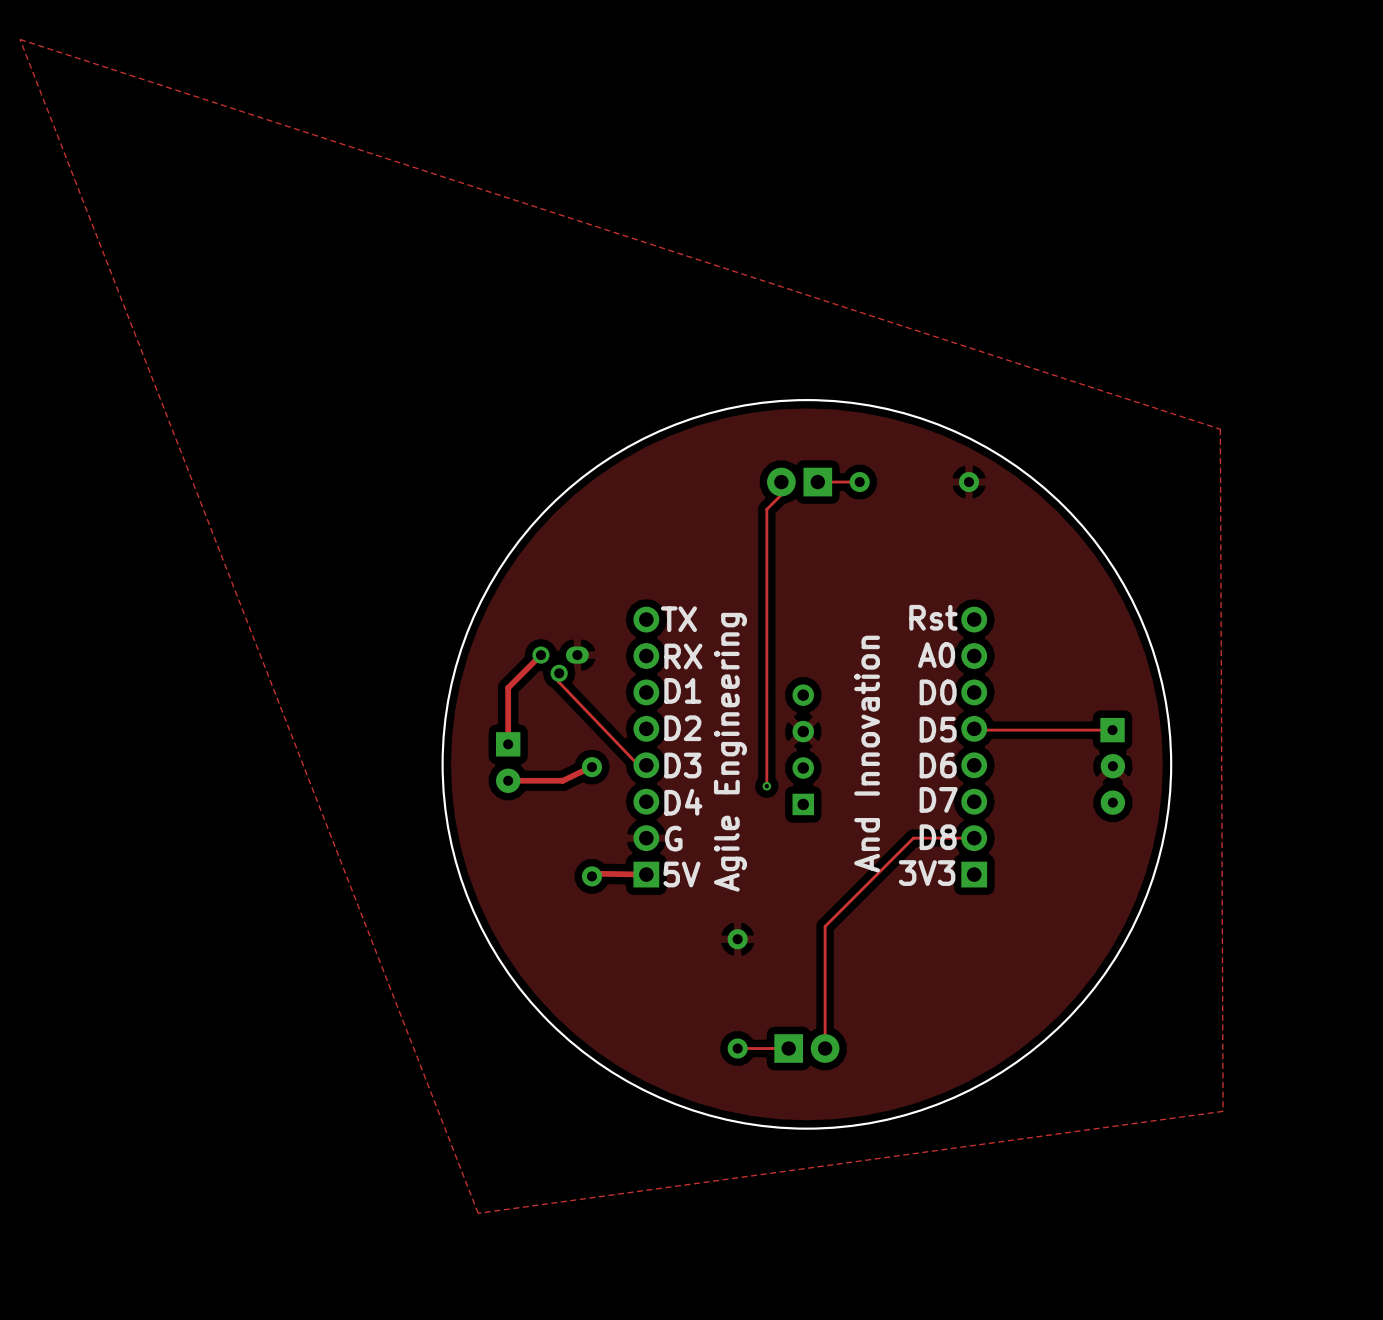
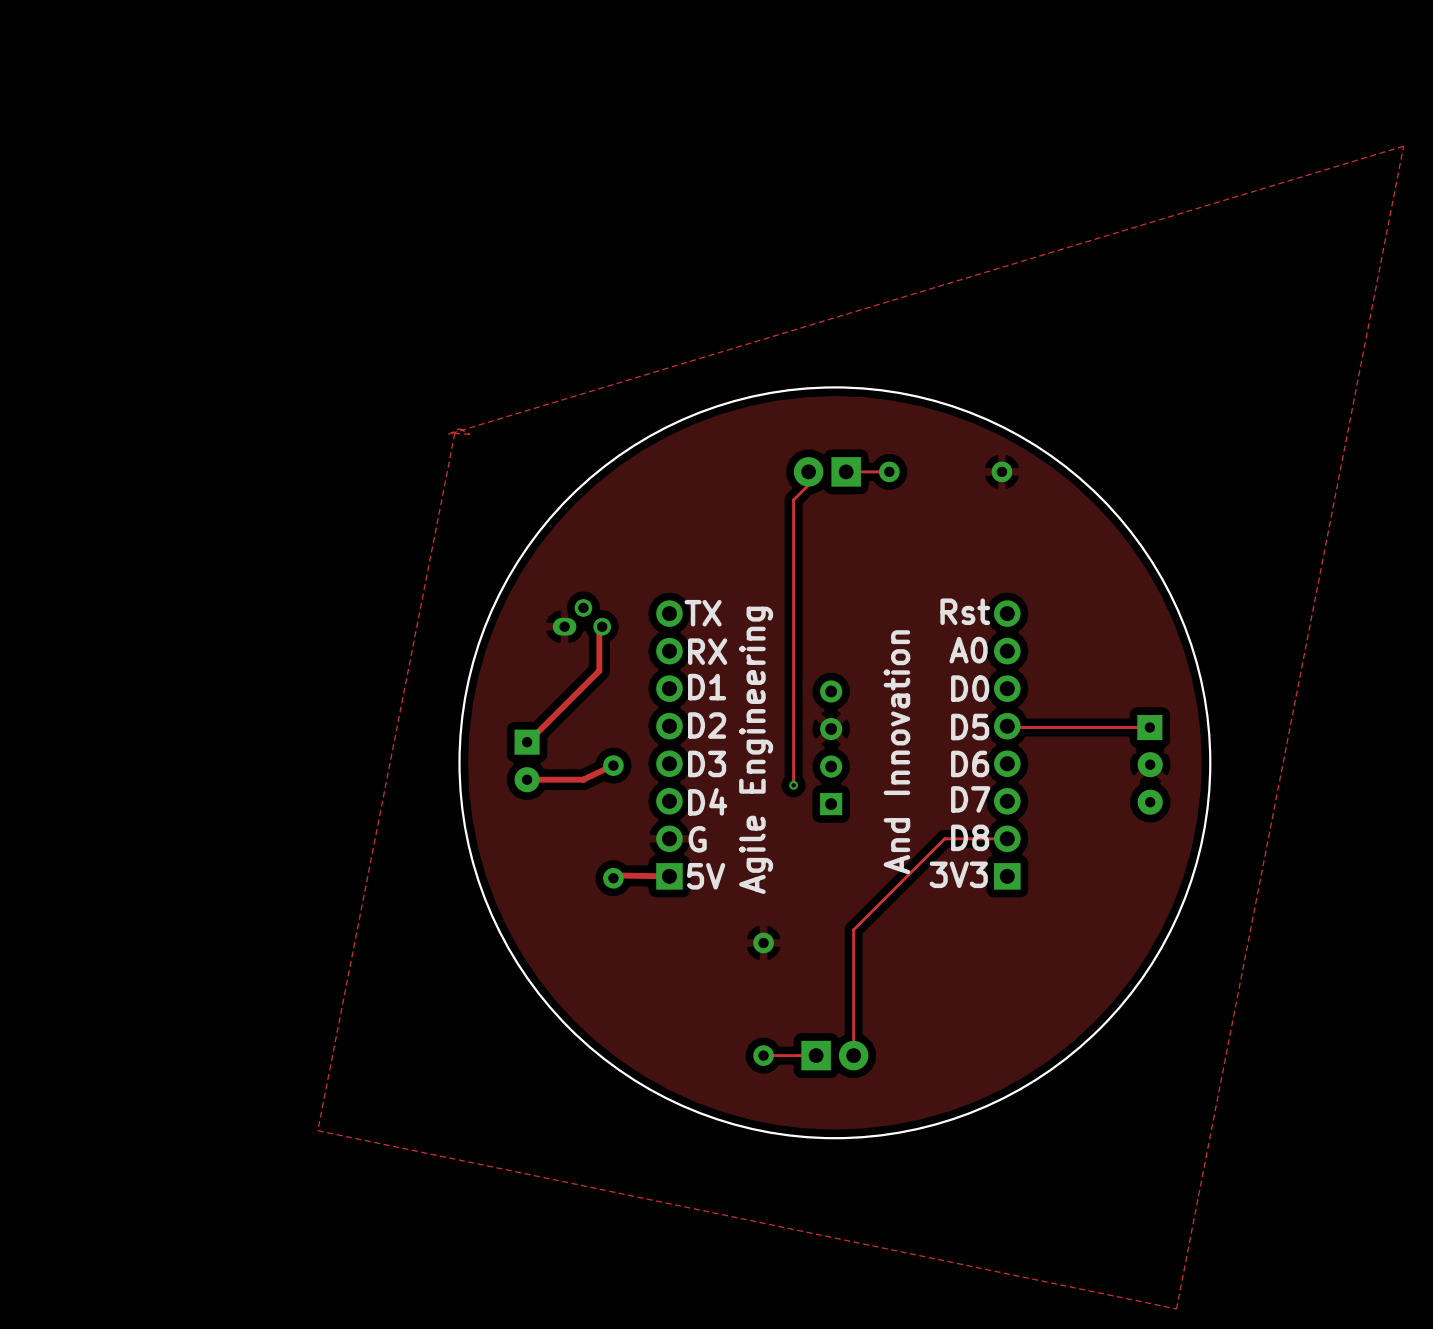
zone outline: (20, 39) (478, 1213) (1223, 1111) (1220, 429) (20, 39) -> (1403, 146) (448, 434) (459, 428) (469, 434) (454, 433) (317, 1130) (1176, 1308) (1403, 146)
track: (540, 655) (508, 687) (508, 744) -> (599, 625) (599, 670) (527, 742)
part rotation: 0° (560, 664) -> 180° (581, 617)
part position: (560, 664) -> (581, 617)
track: (559, 673) (558, 681) (638, 765) -> none

